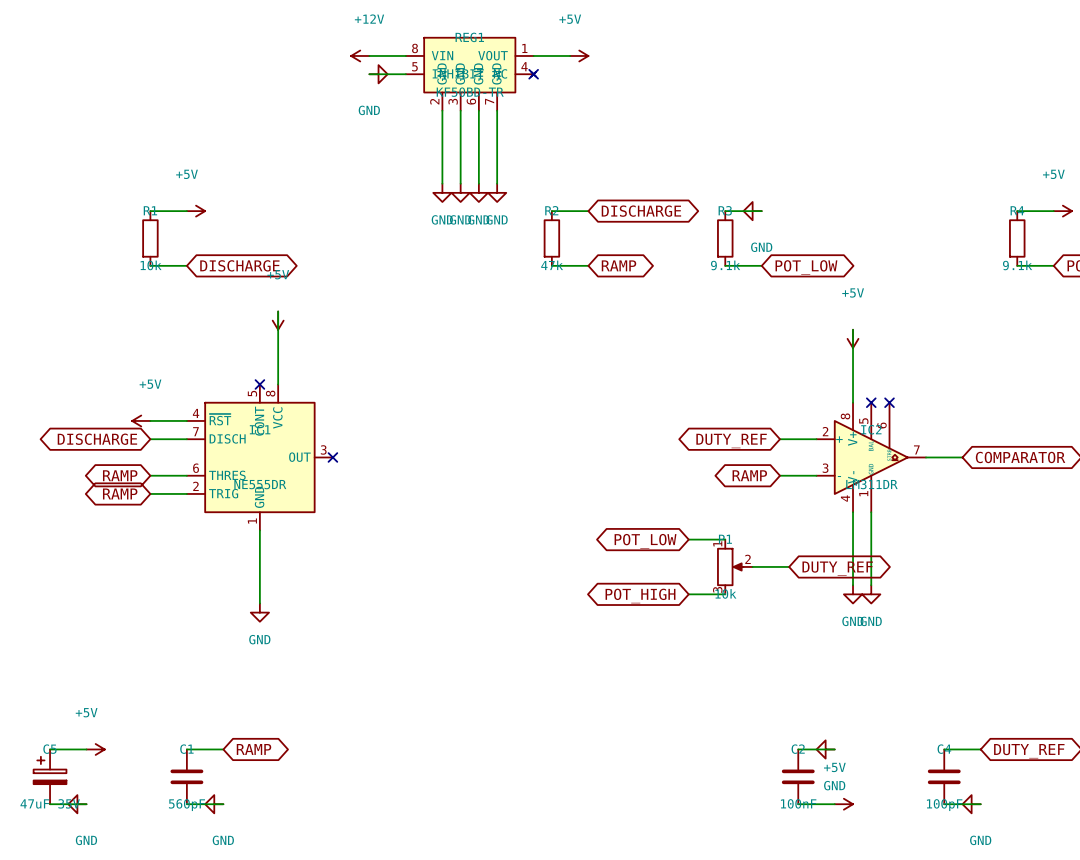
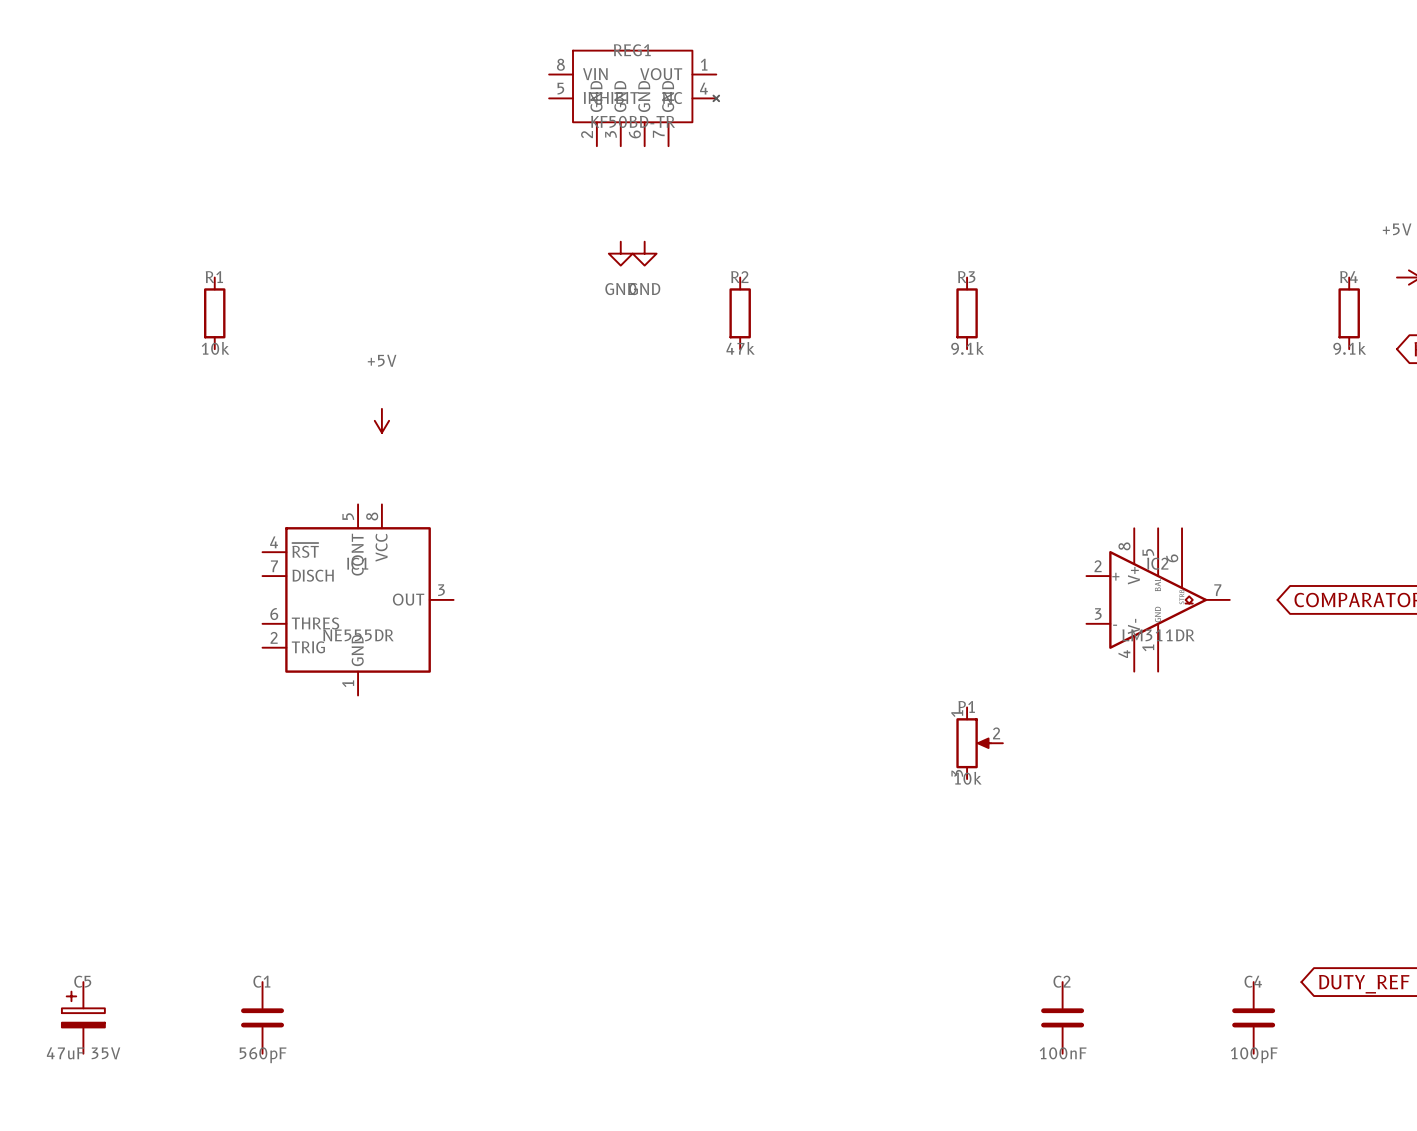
power symbol: +12V (360, 55) -> none
wire: (369, 55) (405, 55) -> none
wire: (533, 55) (570, 55) -> none
power symbol: +5V (579, 55) -> none
wire: (369, 74) (405, 74) -> none
power symbol: GND (378, 74) -> none
no-connect mark: (533, 74) -> none
wire: (442, 110) (442, 183) -> none
wire: (460, 110) (460, 183) -> none
wire: (478, 110) (478, 183) -> none
wire: (497, 110) (497, 183) -> none
power symbol: GND (442, 192) -> none
power symbol: GND (497, 192) -> none
wire: (150, 211) (186, 211) -> none
power symbol: +5V (196, 211) -> none
wire: (551, 211) (588, 211) -> none
global label: DISCHARGE (641, 211) -> none
wire: (725, 211) (761, 211) -> none
power symbol: GND (752, 211) -> none
wire: (1017, 211) (1053, 211) -> none
wire: (150, 265) (186, 265) -> none
global label: DISCHARGE (239, 265) -> none
wire: (551, 265) (588, 265) -> none
global label: RAMP (618, 265) -> none
wire: (725, 265) (761, 265) -> none
wire: (1017, 265) (1053, 265) -> none
global label: POT_LOW (806, 267) -> none
wire: (278, 311) (278, 384) -> none
wire: (853, 329) (853, 402) -> none
power symbol: +5V (853, 338) -> none
no-connect mark: (259, 384) -> none
no-connect mark: (871, 402) -> none
no-connect mark: (889, 402) -> none
power symbol: +5V (141, 420) -> none
wire: (150, 420) (186, 420) -> none
global label: DISCHARGE (97, 439) -> none
wire: (150, 439) (186, 439) -> none
wire: (780, 439) (816, 439) -> none
global label: DUTY_REF (731, 441) -> none
no-connect mark: (332, 457) -> none
wire: (926, 457) (962, 457) -> none
global label: RAMP (120, 475) -> none
wire: (150, 475) (186, 475) -> none
global label: RAMP (749, 475) -> none
wire: (780, 475) (816, 475) -> none
global label: RAMP (120, 493) -> none
wire: (150, 493) (186, 493) -> none
wire: (853, 512) (853, 585) -> none
wire: (871, 512) (871, 585) -> none
wire: (259, 530) (259, 603) -> none
wire: (688, 539) (725, 539) -> none
global label: POT_LOW (645, 541) -> none
wire: (752, 566) (789, 566) -> none
global label: DUTY_REF (837, 568) -> none
wire: (688, 594) (725, 594) -> none
power symbol: GND (853, 594) -> none
power symbol: GND (871, 594) -> none
global label: POT_HIGH (640, 596) -> none
power symbol: GND (259, 612) -> none
wire: (50, 749) (86, 749) -> none
power symbol: +5V (95, 749) -> none
wire: (186, 749) (223, 749) -> none
global label: RAMP (254, 749) -> none
wire: (798, 749) (834, 749) -> none
power symbol: GND (825, 749) -> none
wire: (944, 749) (980, 749) -> none
wire: (50, 804) (86, 804) -> none
power symbol: GND (77, 804) -> none
wire: (186, 804) (223, 804) -> none
power symbol: GND (214, 804) -> none
wire: (798, 804) (834, 804) -> none
power symbol: +5V (843, 804) -> none
wire: (944, 804) (980, 804) -> none
power symbol: GND (971, 804) -> none

